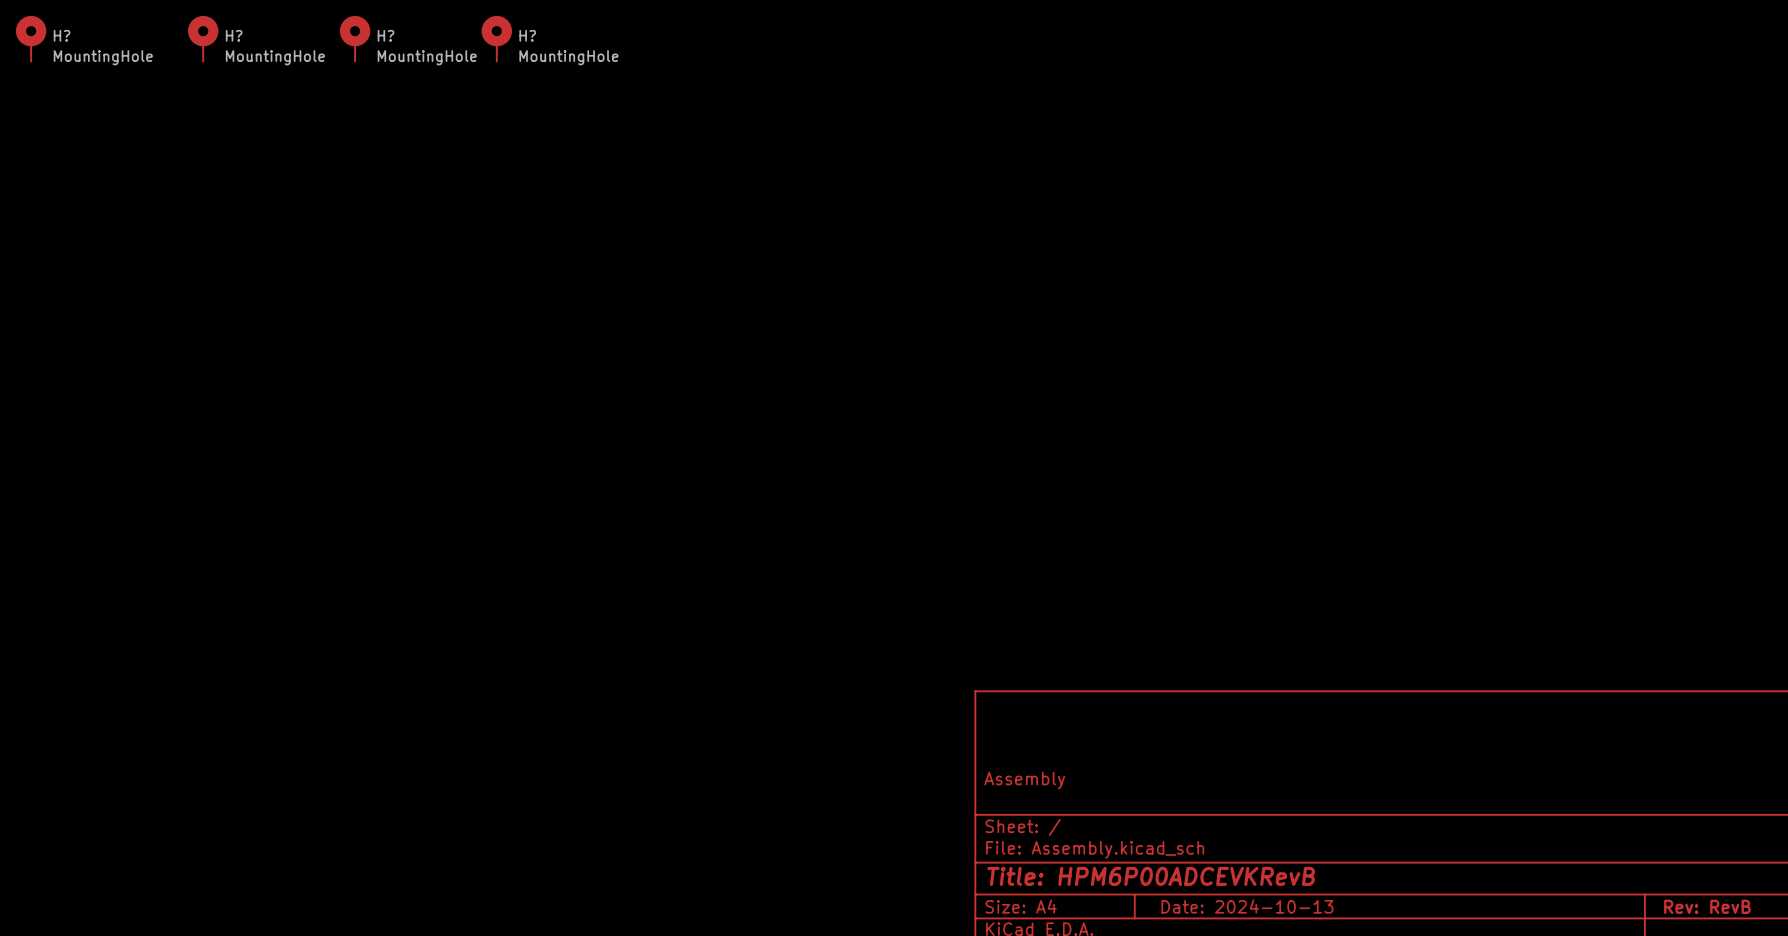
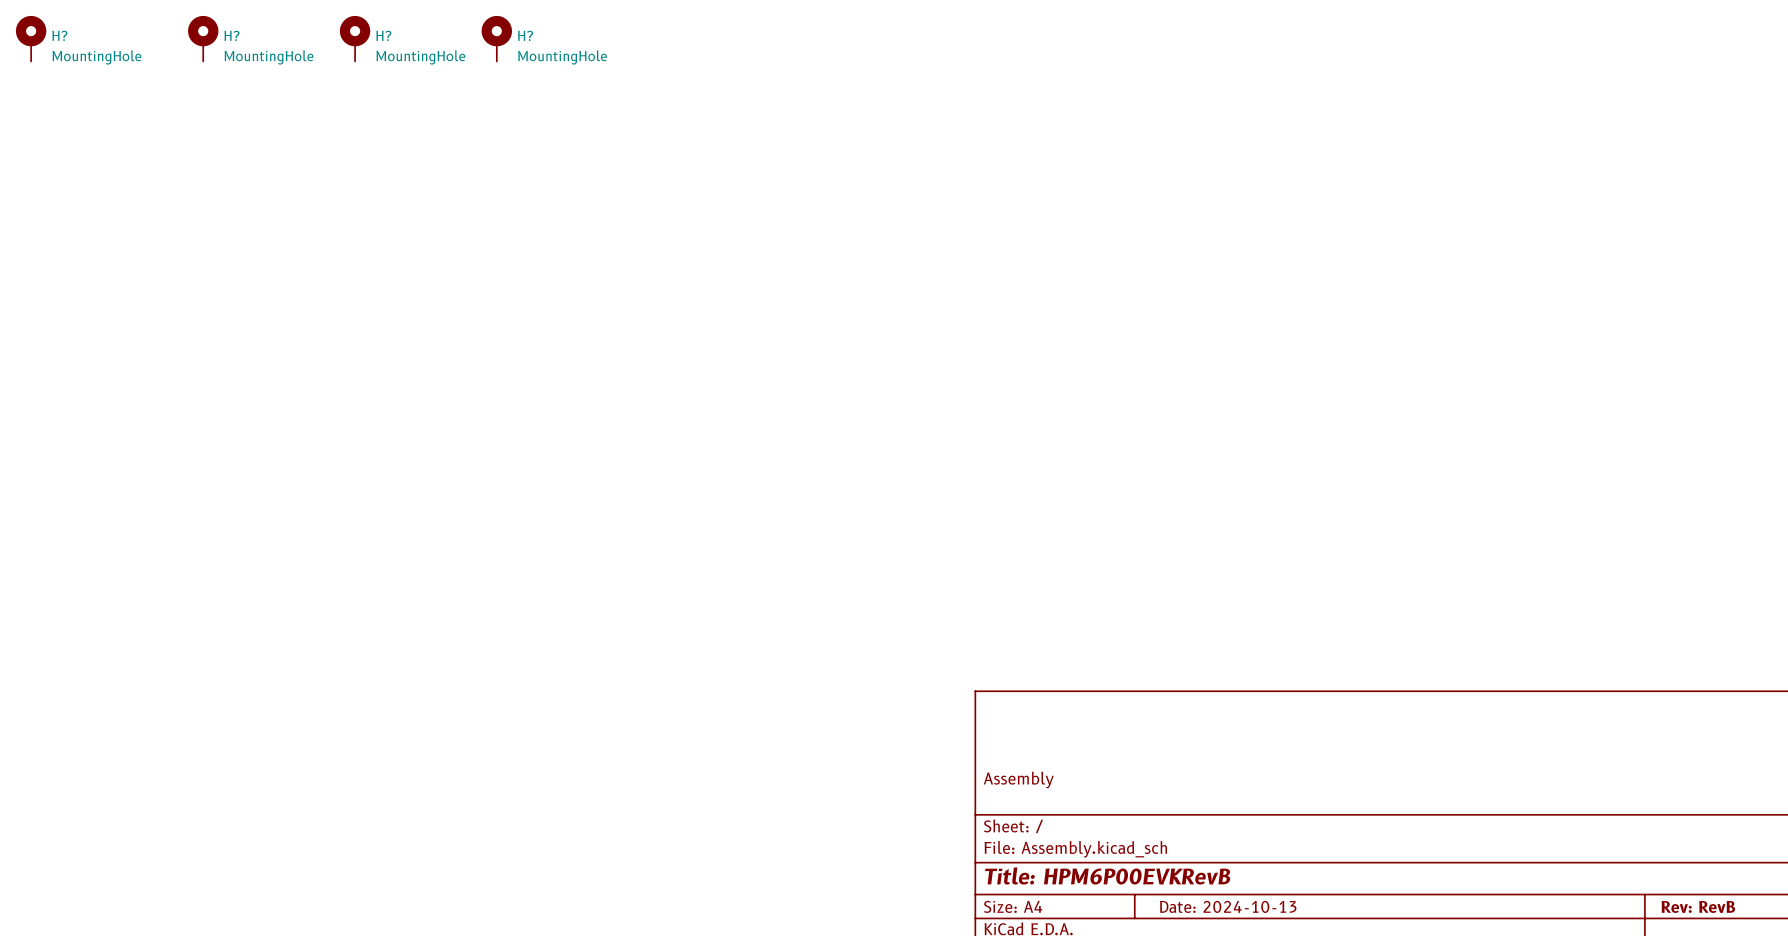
title block: Title: HPM6P00ADCEVKRevB (1151, 876) -> Title: HPM6P00EVKRevB (1107, 875)

